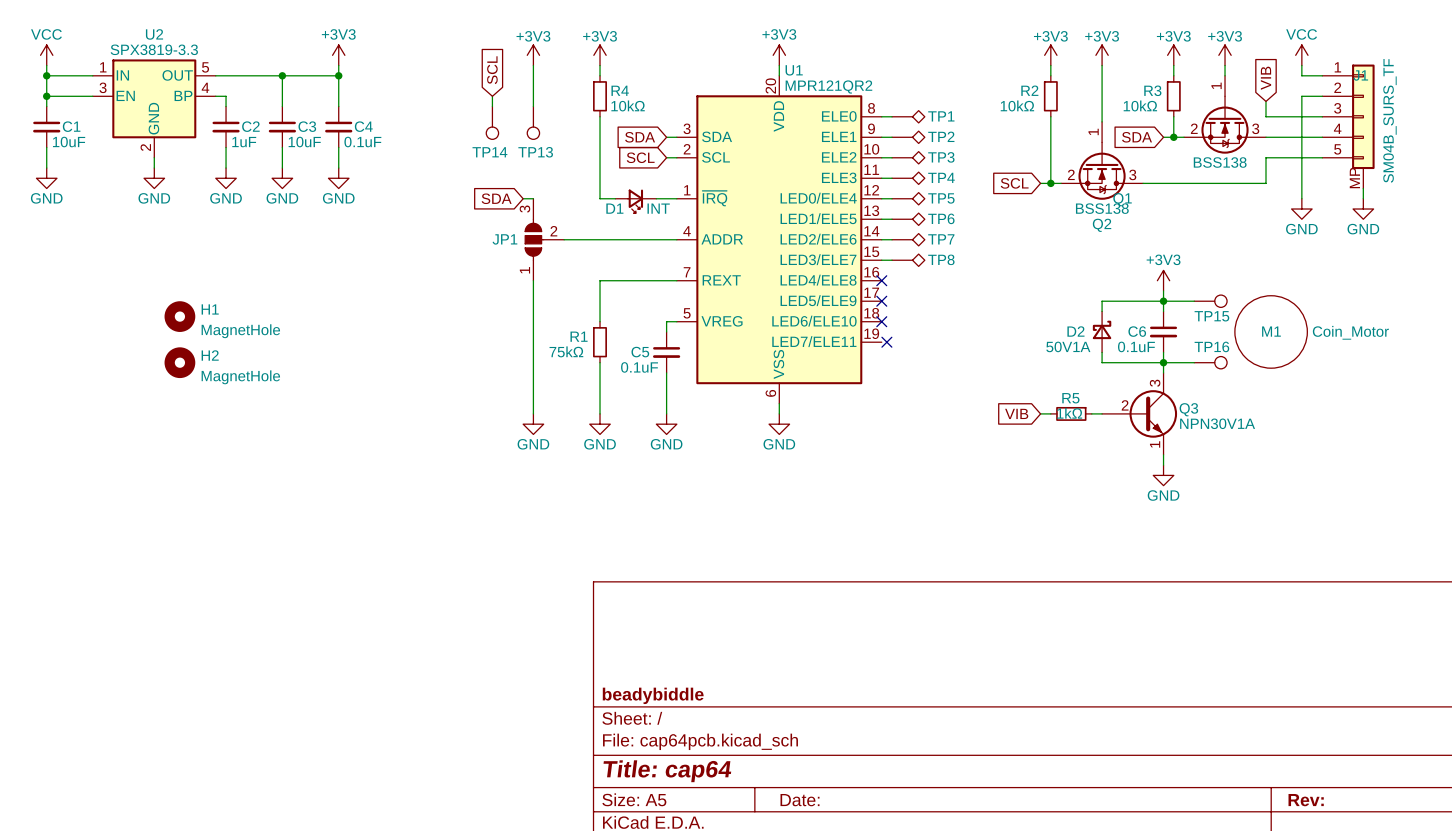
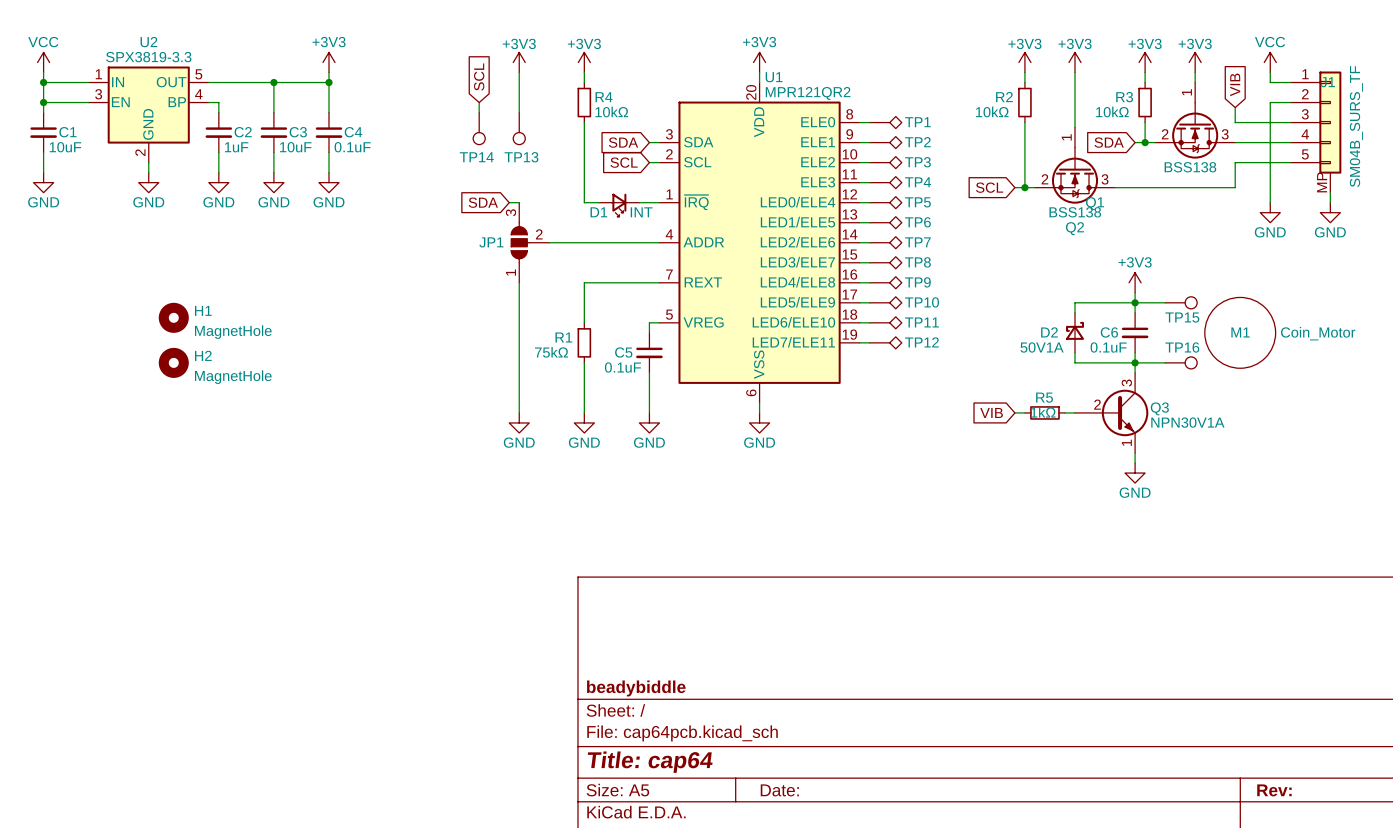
wire: none -> (859, 282) (869, 282)
no-connect mark: (881, 280) -> none
TP9: none -> (885, 282)
wire: none -> (859, 302) (869, 302)
no-connect mark: (881, 301) -> none
TP10: none -> (885, 302)
wire: none -> (859, 322) (869, 322)
no-connect mark: (881, 321) -> none
TP11: none -> (885, 322)
wire: none -> (859, 342) (869, 342)
no-connect mark: (886, 342) -> none
TP12: none -> (885, 342)

